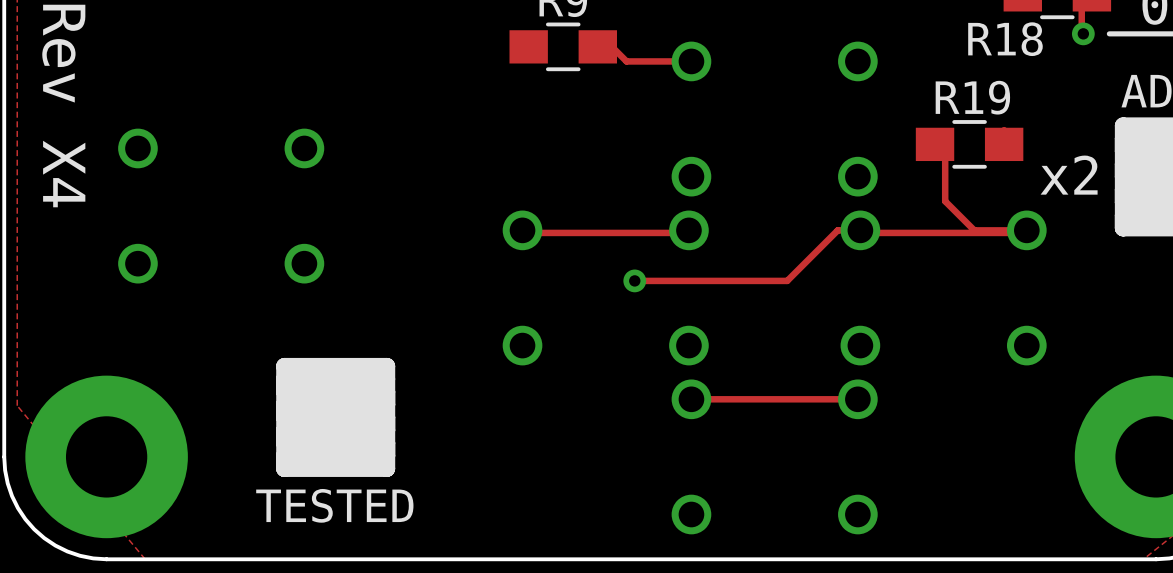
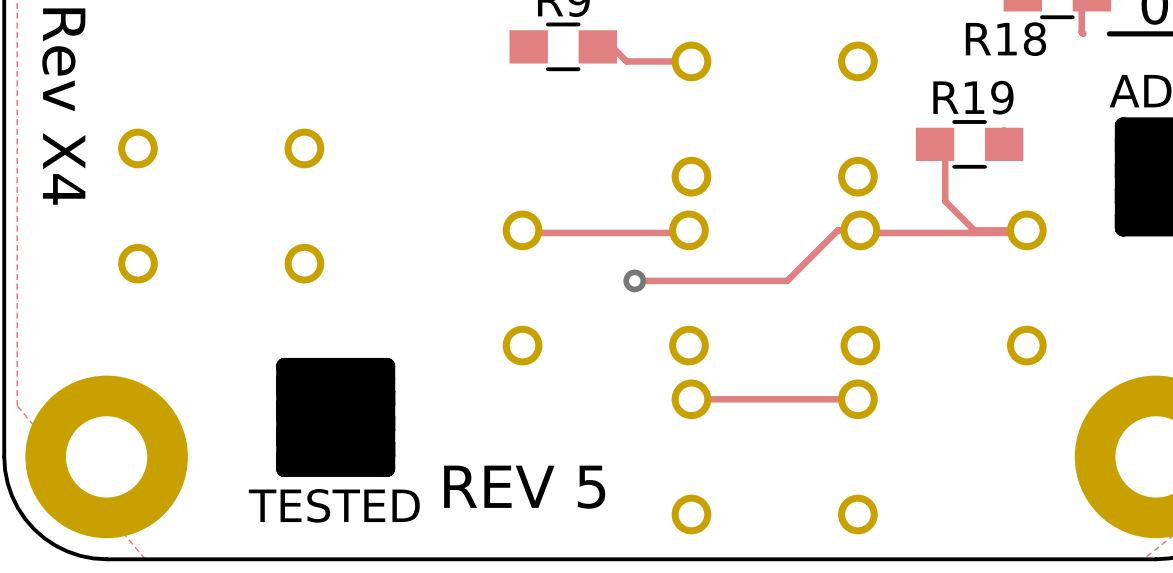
via: (1083, 33) -> none
text: x2 (1069, 175) -> none
text: none -> REV 5 (524, 487)

